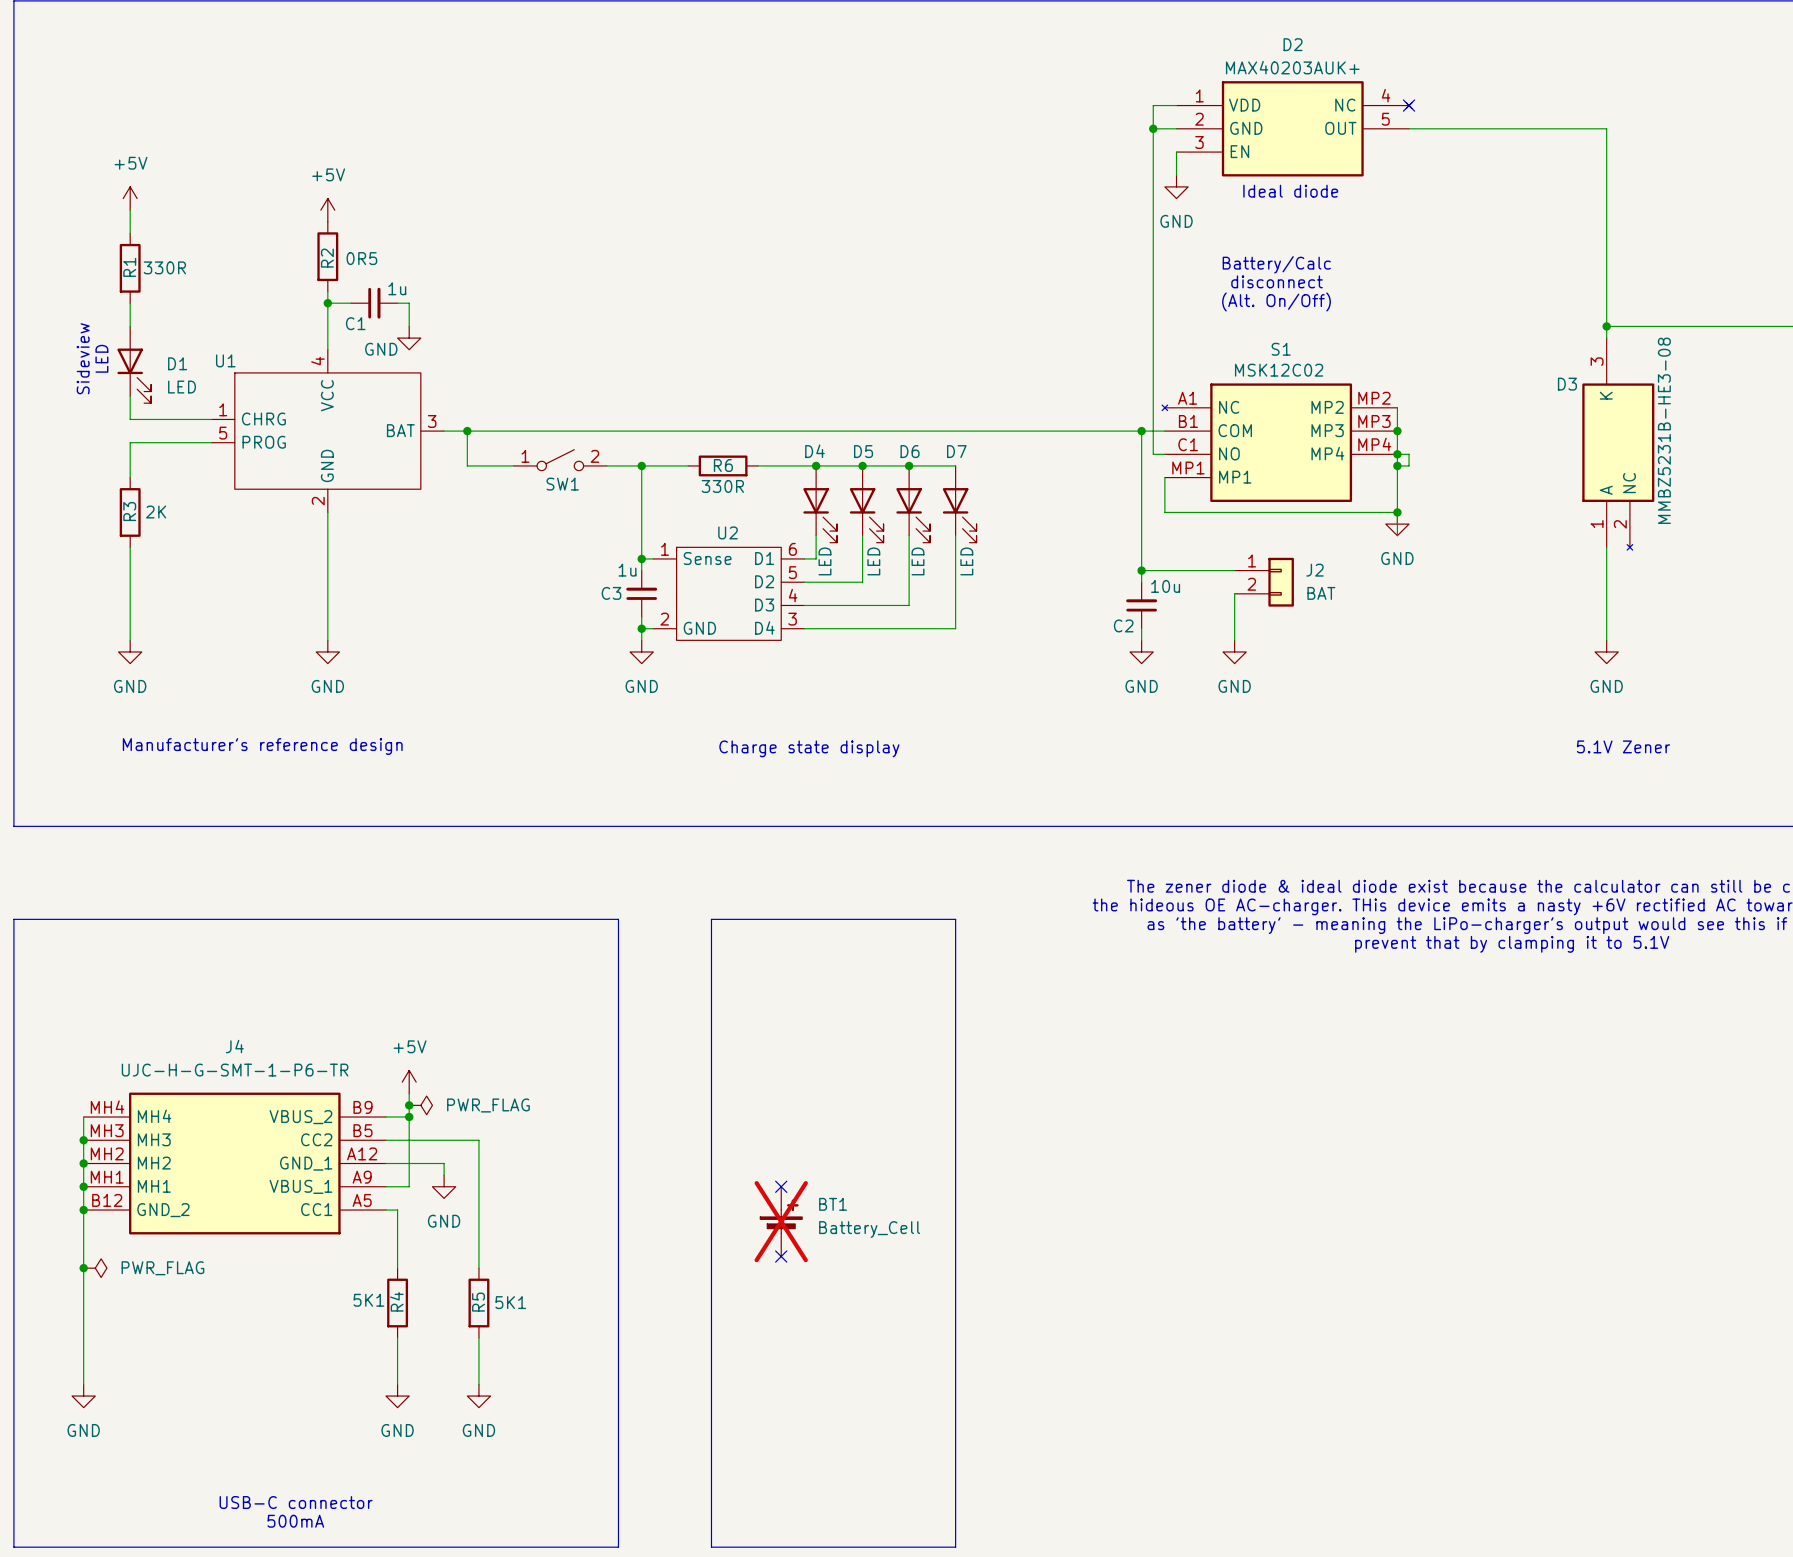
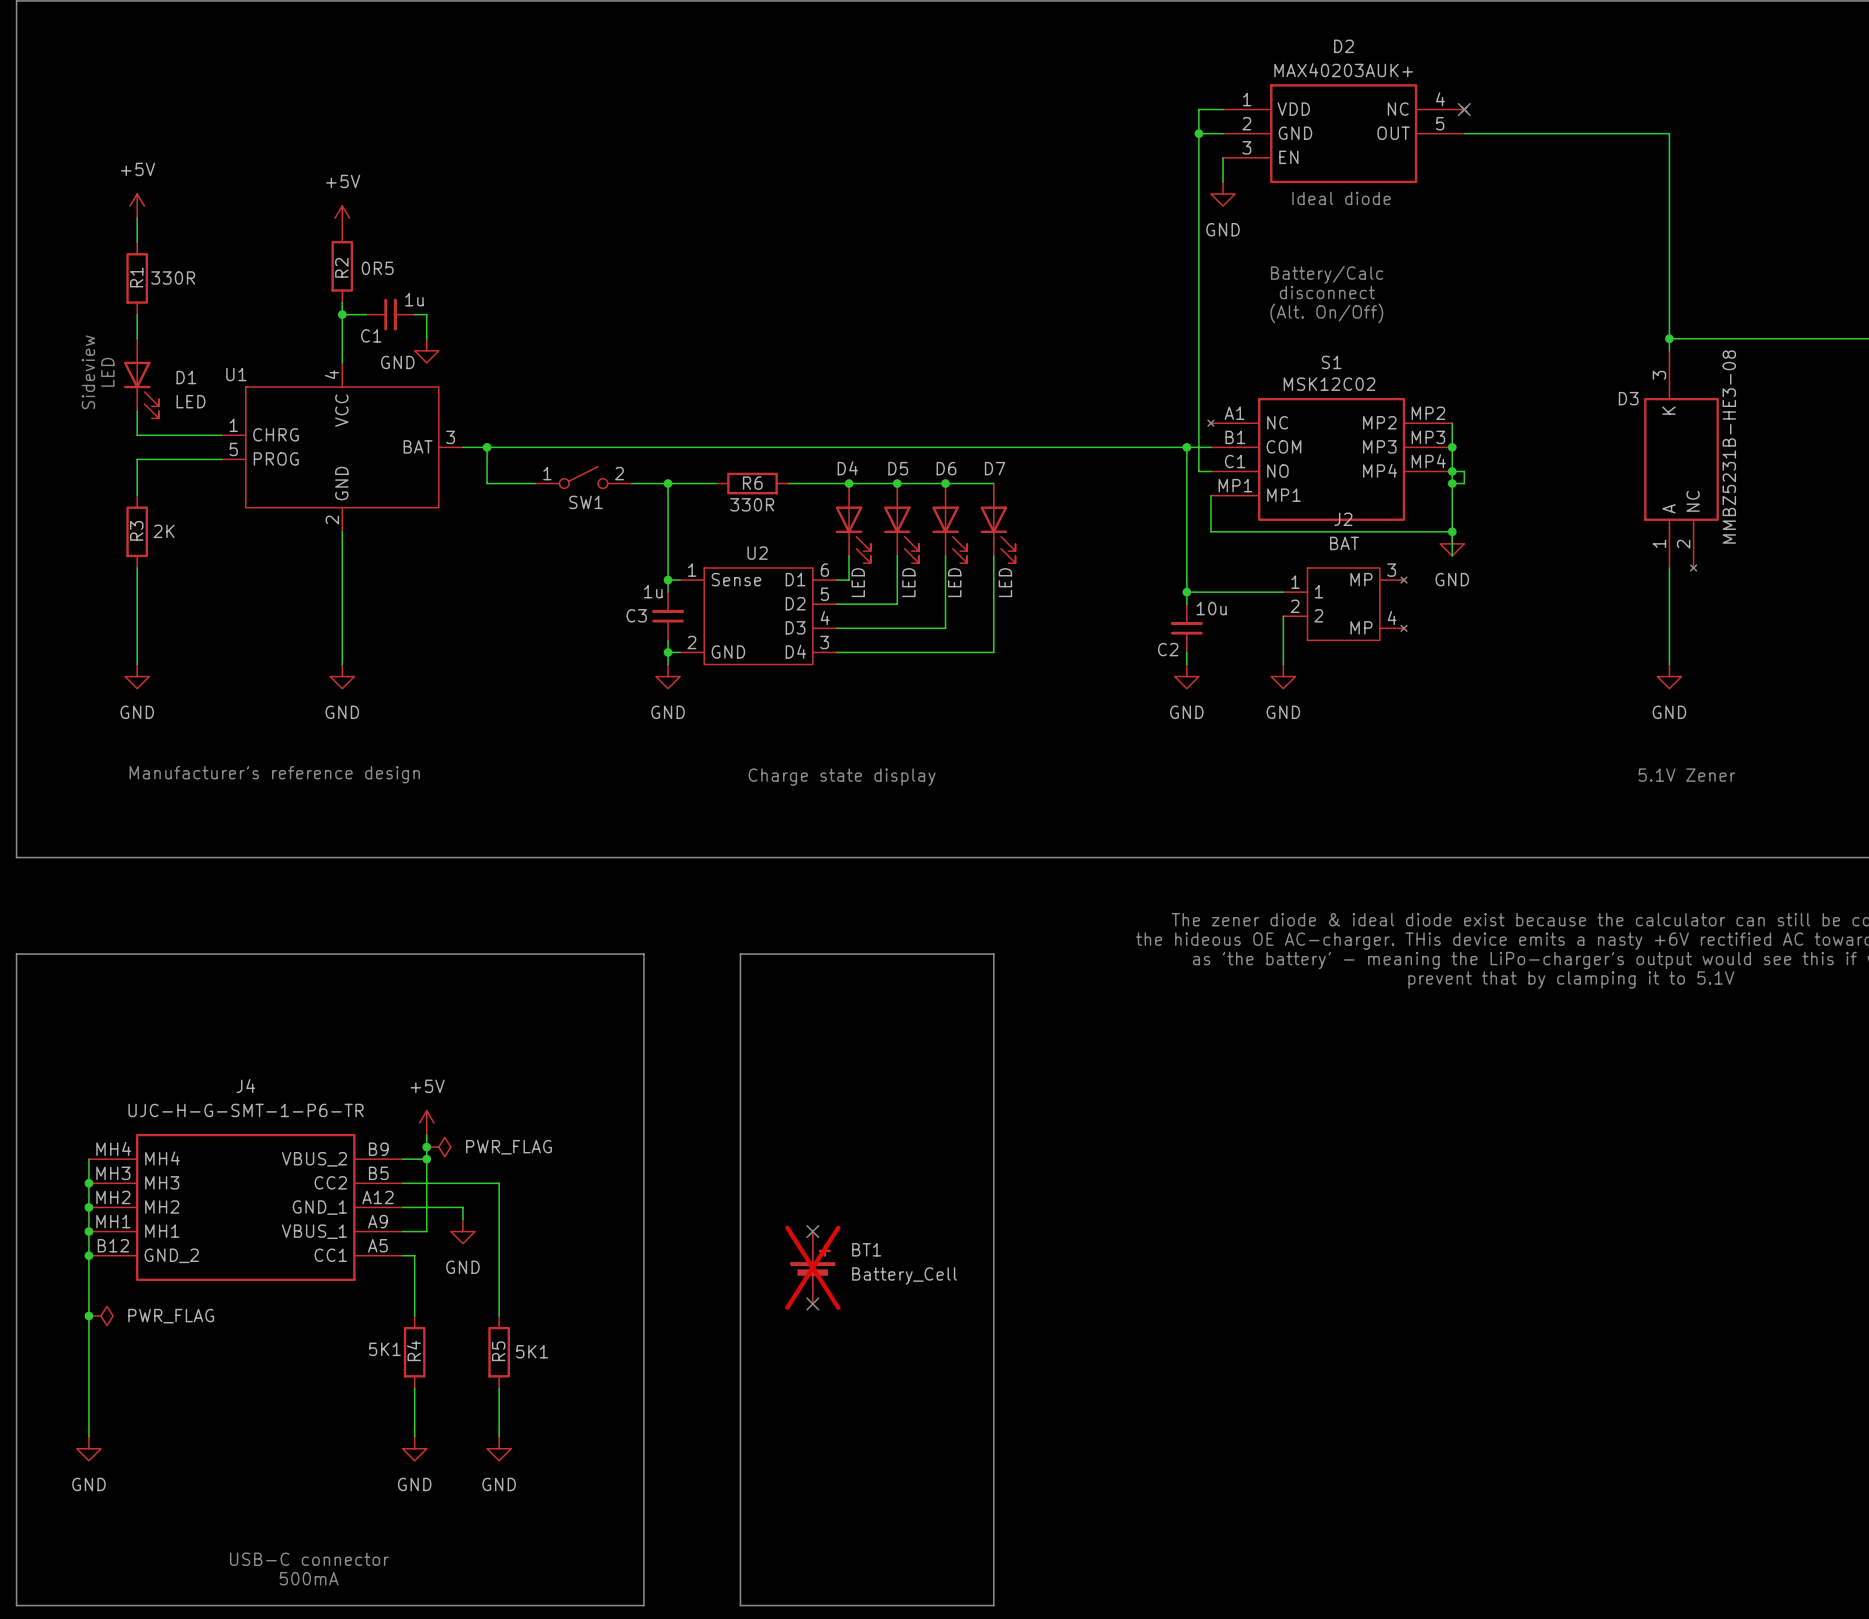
J2 symbol: [1234, 557, 1294, 607] -> [1283, 568, 1407, 641]
J2 name position: J2 (1315, 570) -> J2 (1343, 519)
J2 value position: BAT (1321, 593) -> BAT (1344, 543)

